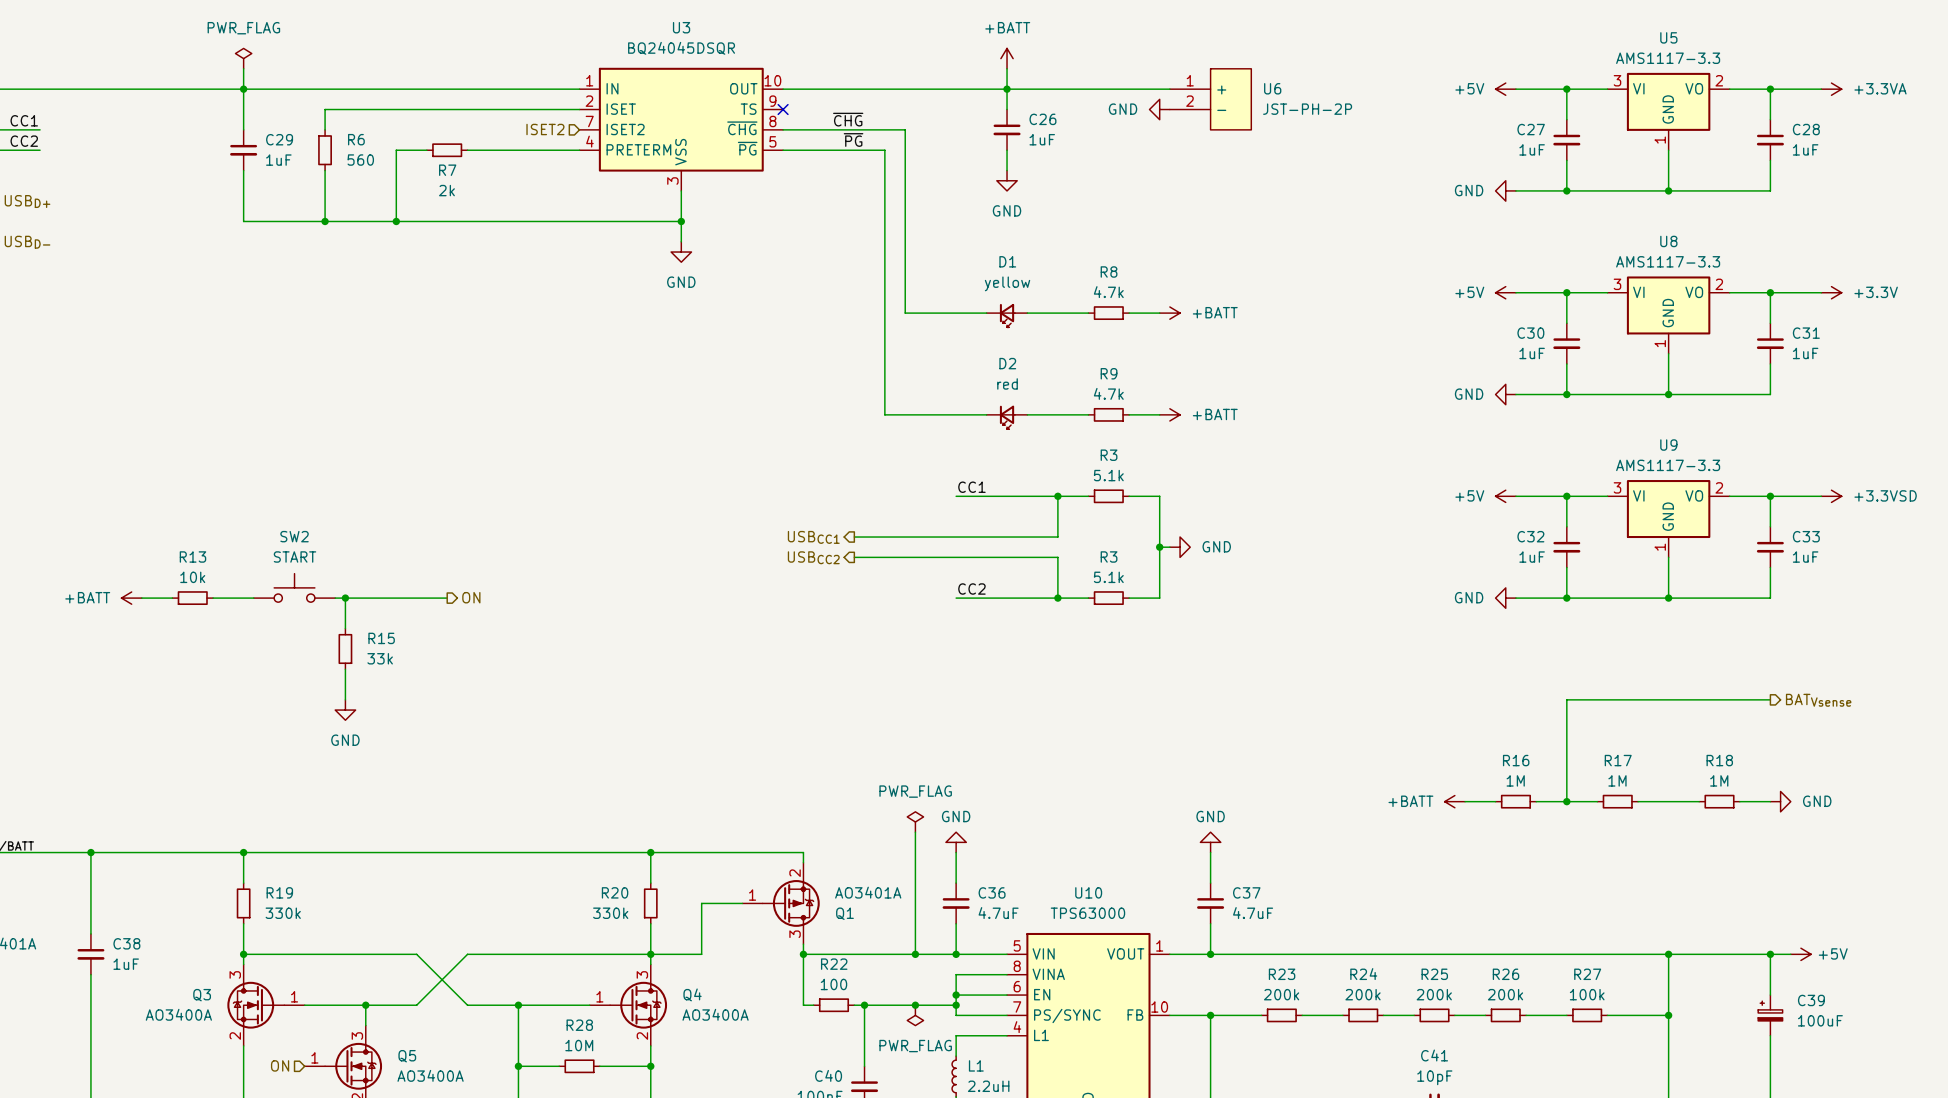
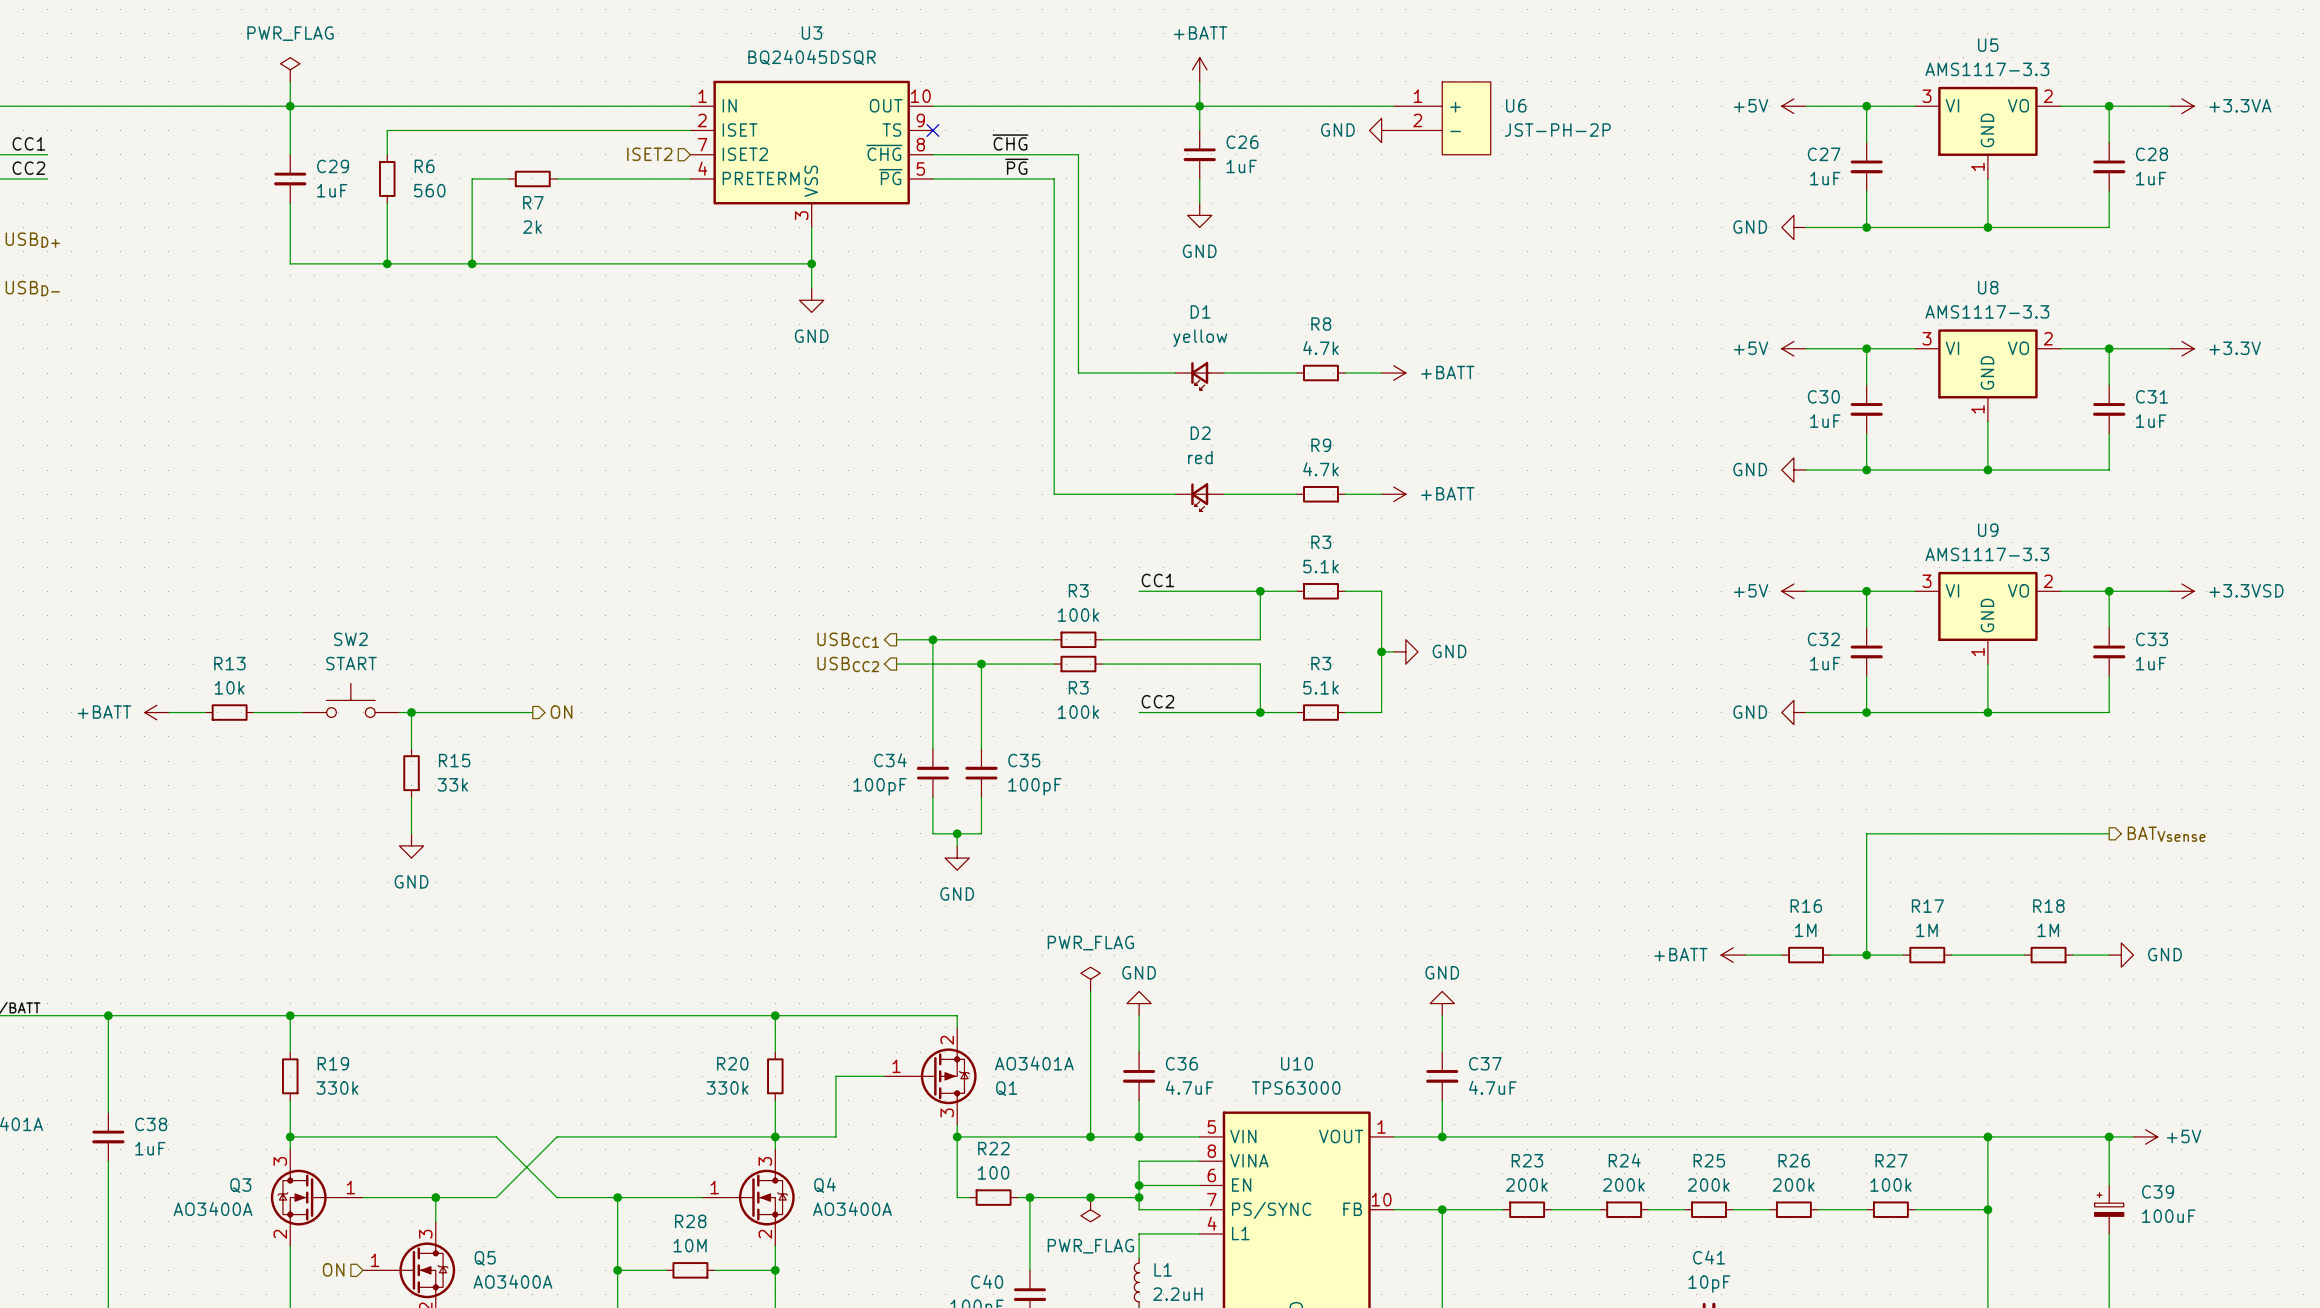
wire: none -> (896, 639) (1017, 639)
wire: none -> (932, 639) (932, 748)
junction: none -> (932, 639)
hierarchical label position: USBCC1 (813, 537) -> USBCC1 (848, 640)
wire: (884, 537) (925, 537) -> none
R3: none -> 100k (1078, 639)
wire: none -> (896, 664) (1017, 664)
hierarchical label position: USBCC2 (813, 557) -> USBCC2 (848, 664)
wire: none -> (981, 664) (981, 748)
junction: none -> (981, 664)
wire: (884, 557) (925, 557) -> none
R3: none -> 100k (1078, 664)
C34: none -> 100pF (932, 773)
C35: none -> 100pF (981, 773)
wire: none -> (932, 797) (932, 833) (981, 833) (981, 797)
wire: none -> (957, 833) (957, 845)
junction: none -> (957, 833)
power symbol: none -> GND (957, 858)

